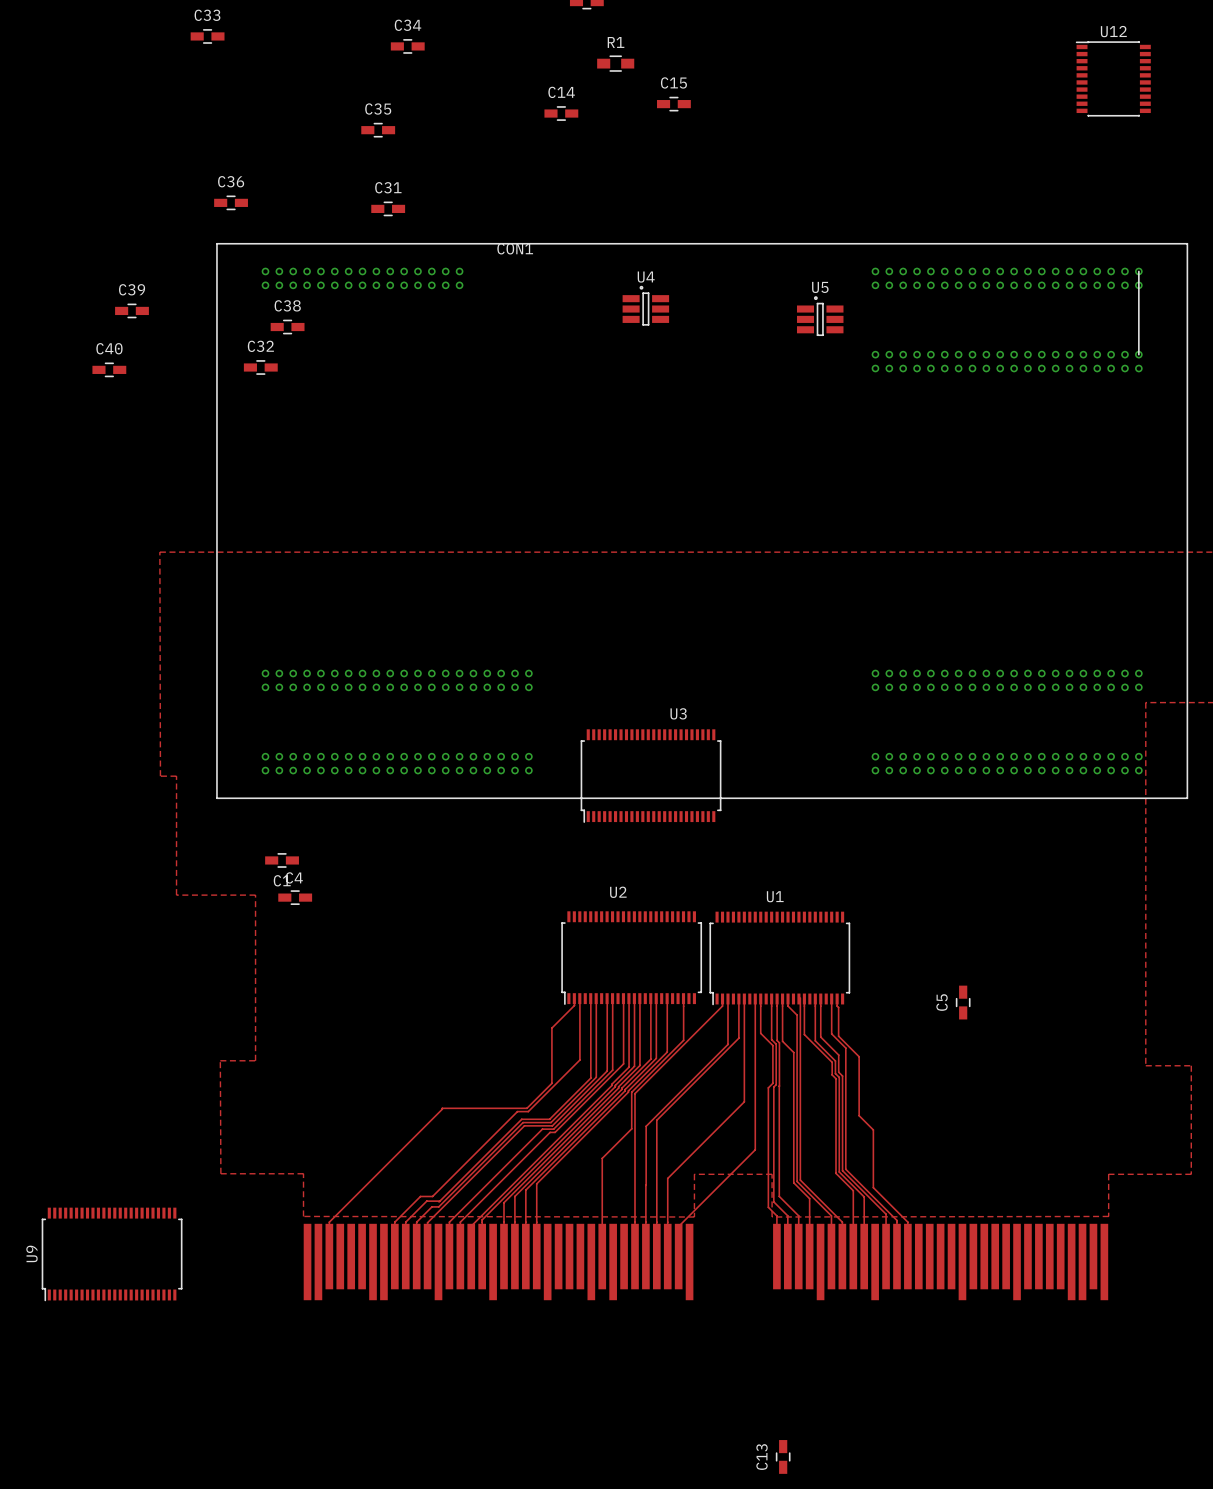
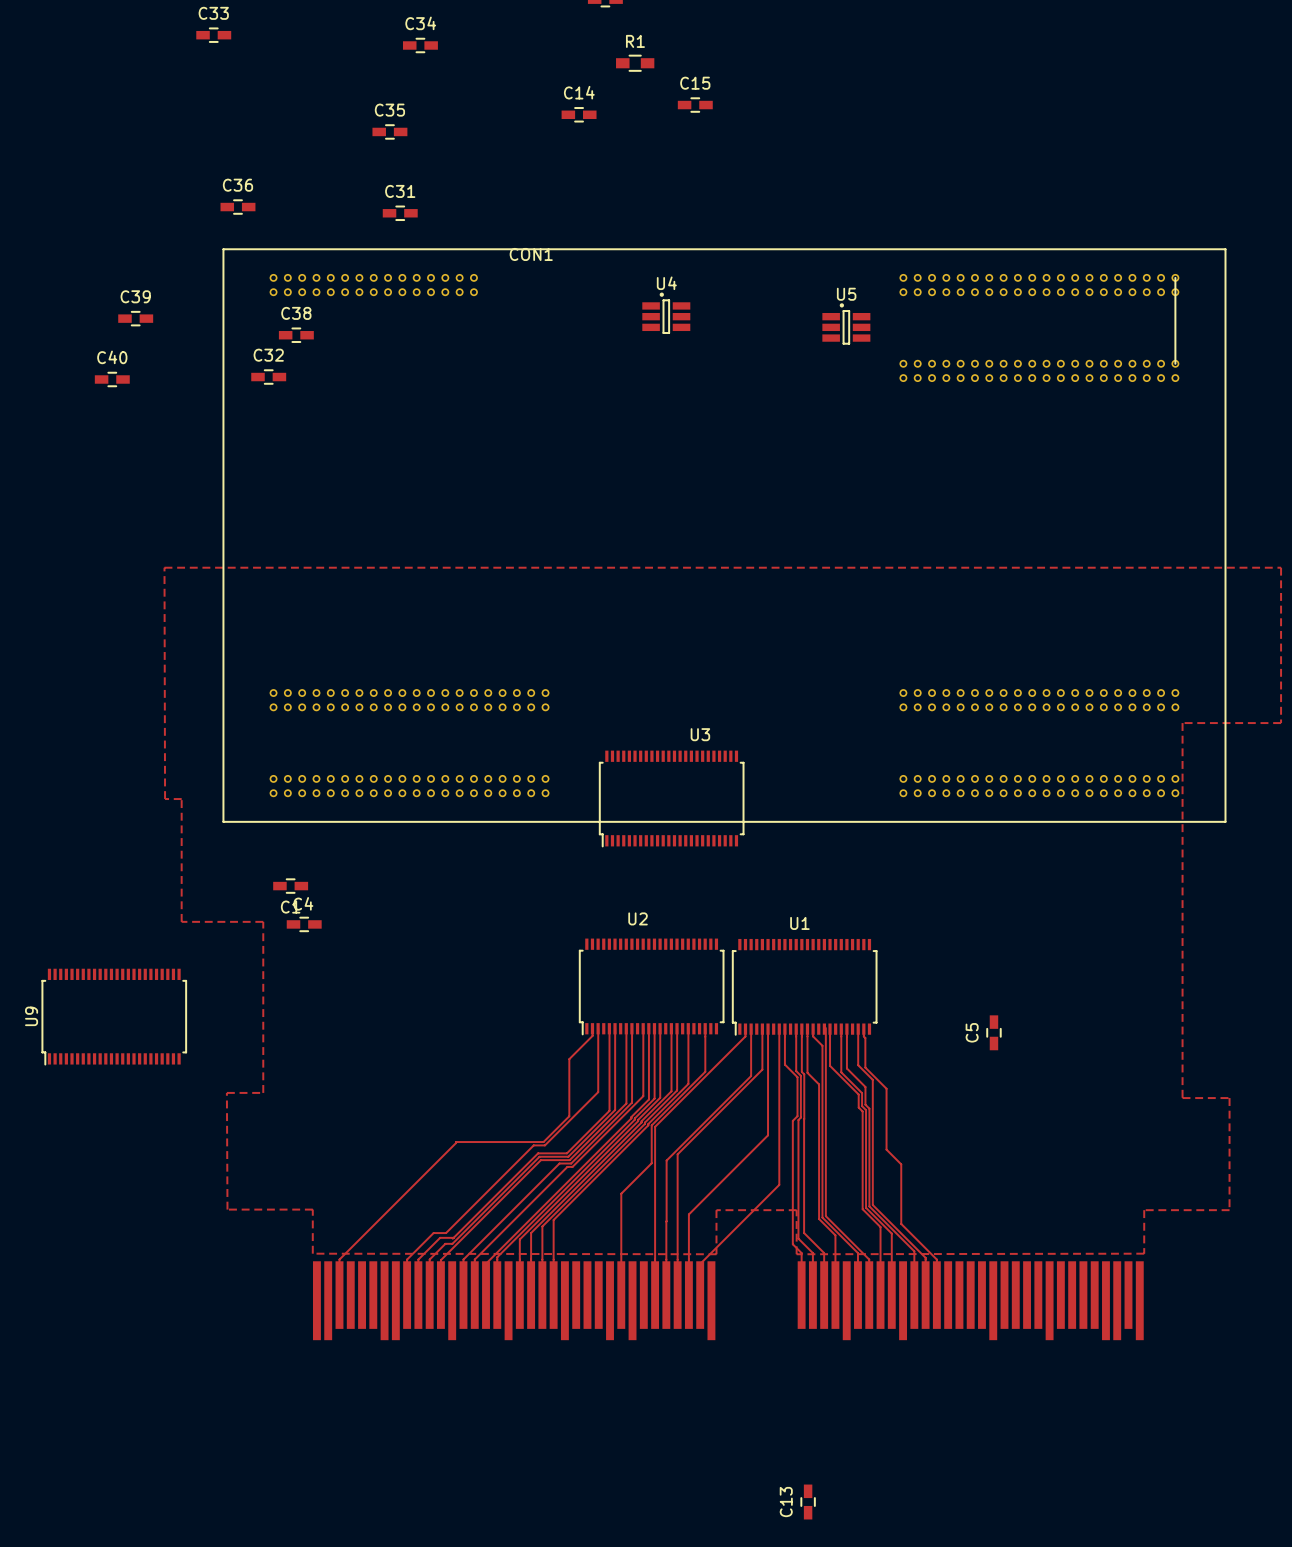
U12: (1113, 78) -> none
U9 position: (112, 1254) -> (114, 1017)

